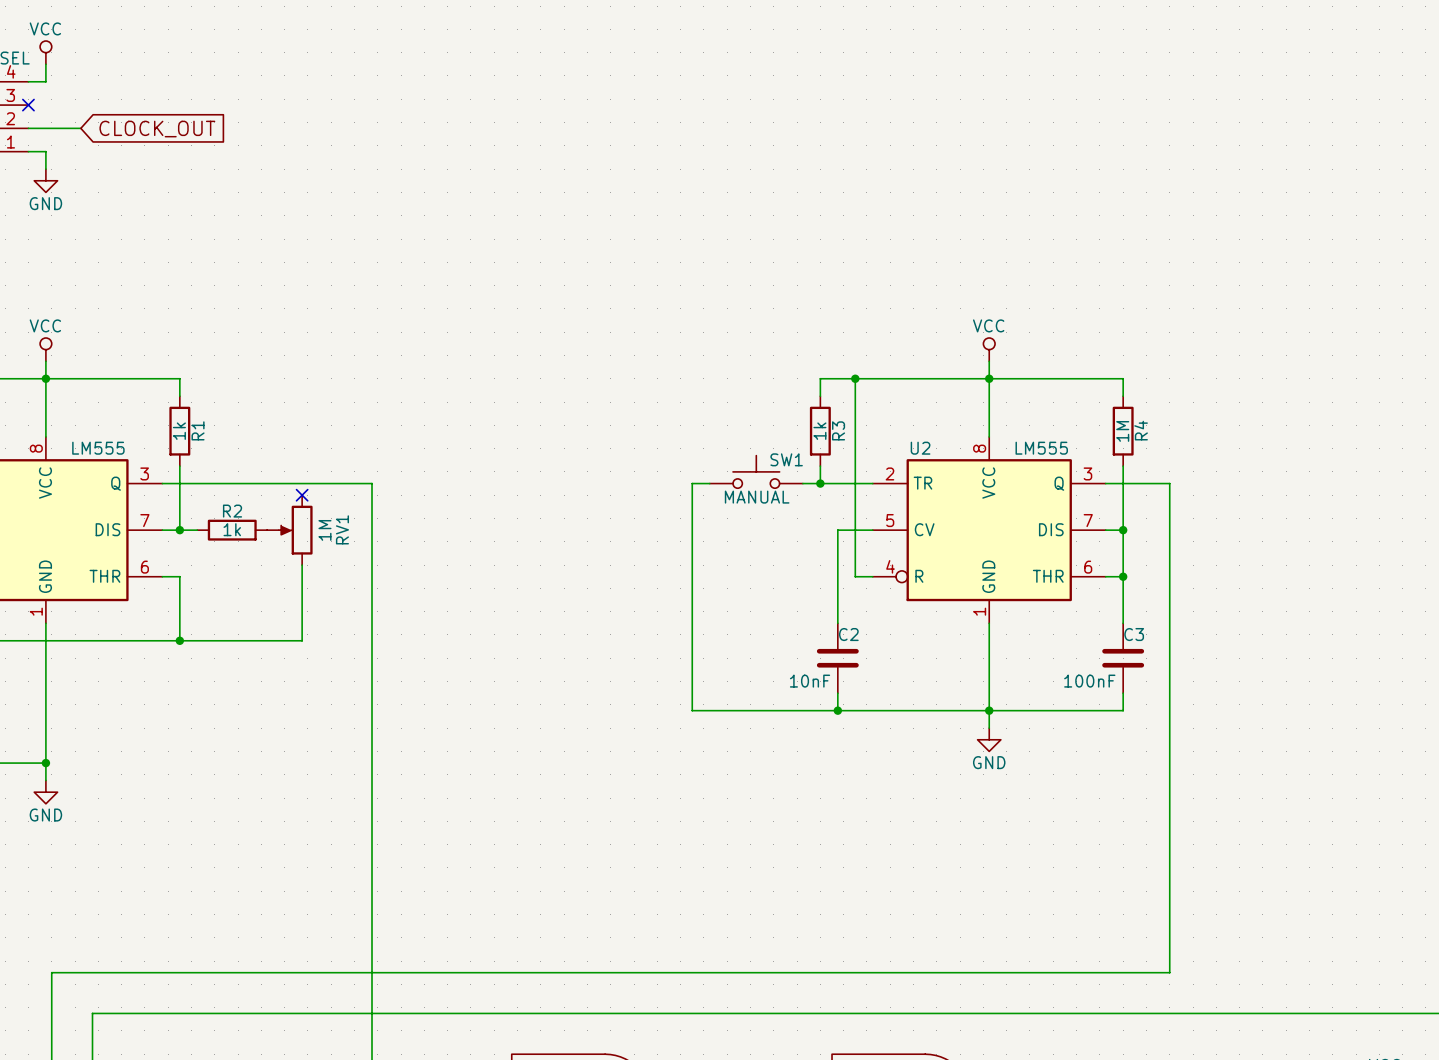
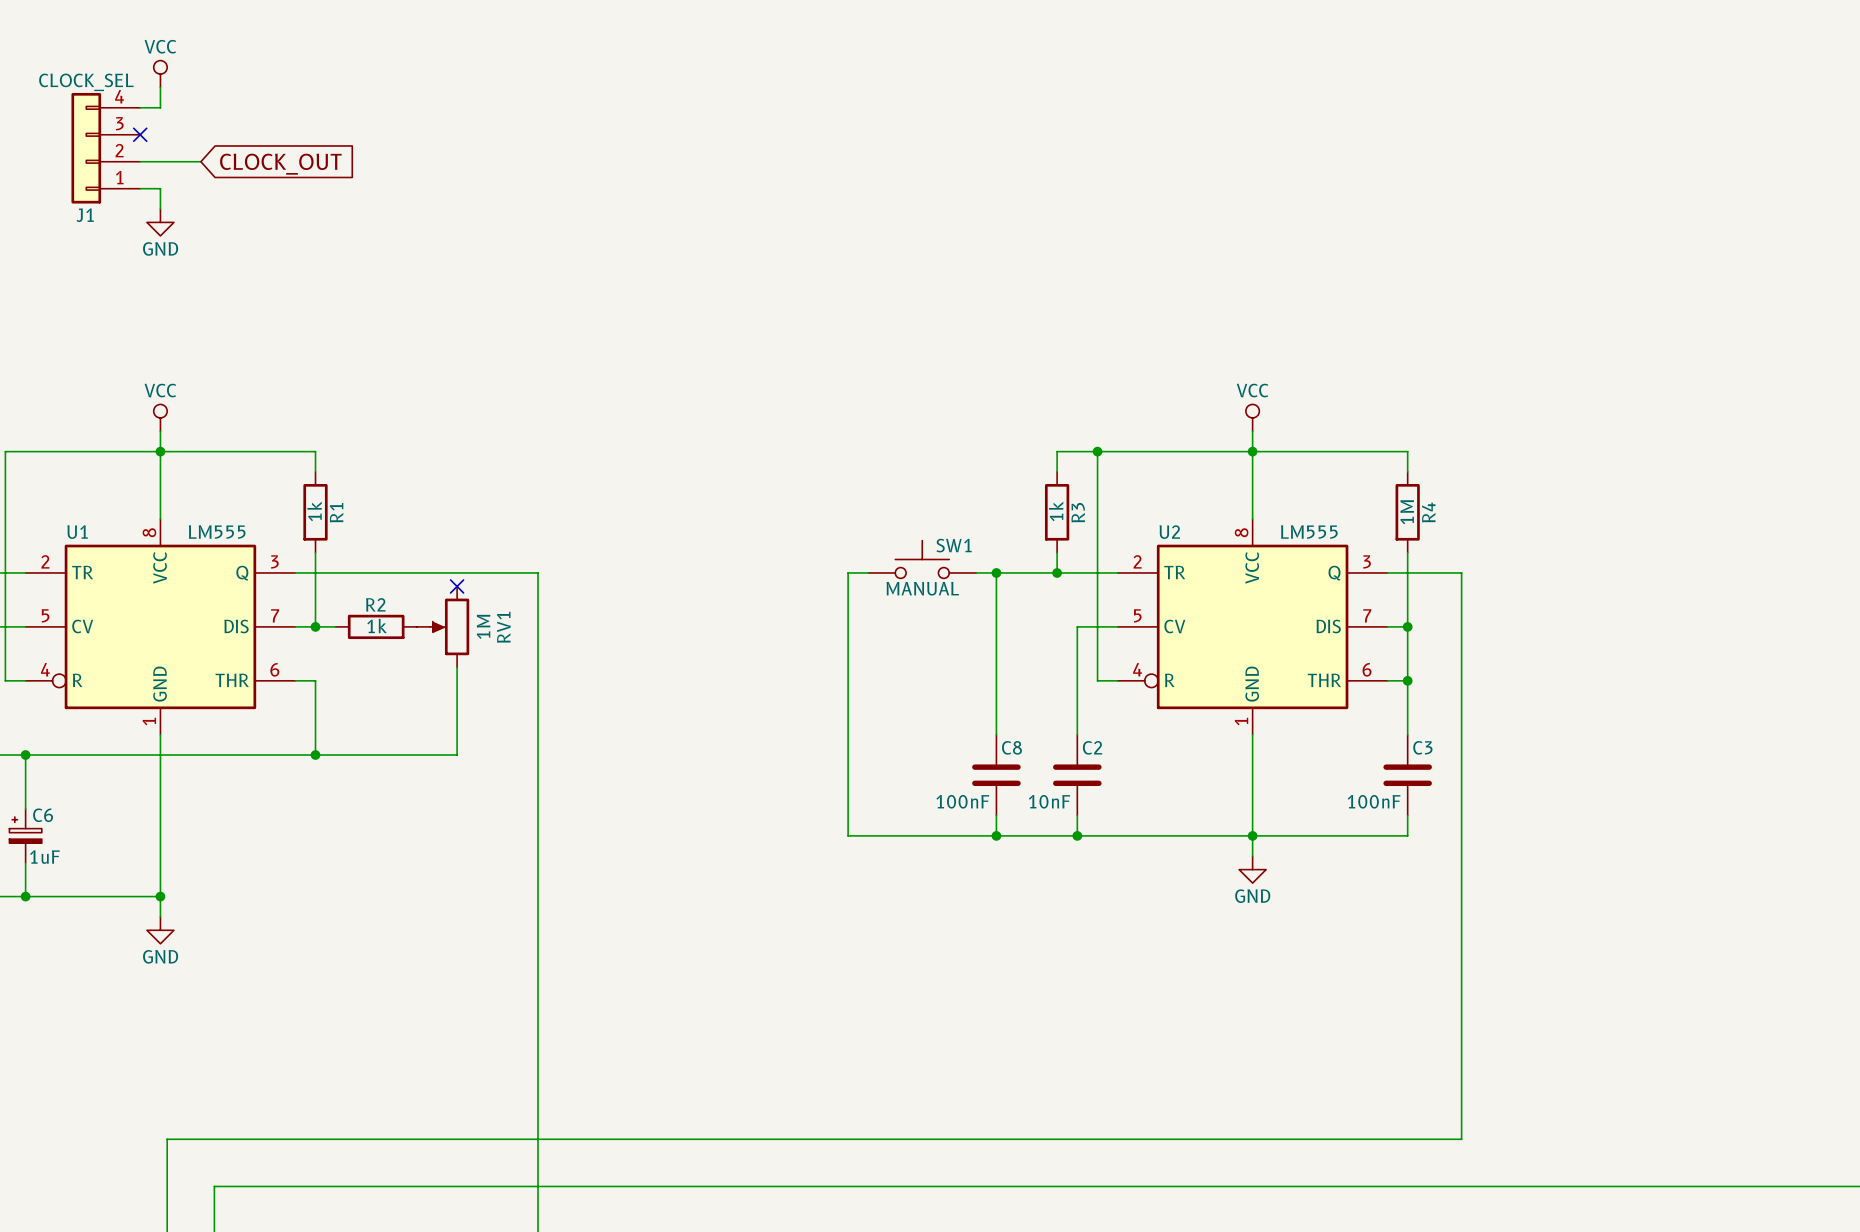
SW1 position: (756, 471) -> (922, 559)
wire: (709, 483) (692, 483) (692, 710) -> (868, 572) (848, 572) (848, 835) (908, 835)
wire: none -> (976, 572) (1036, 572)
wire: none -> (996, 572) (996, 734)
junction: none -> (996, 572)
C8: none -> 100nF (996, 775)
wire: none -> (996, 815) (996, 835)
junction: none -> (996, 835)

